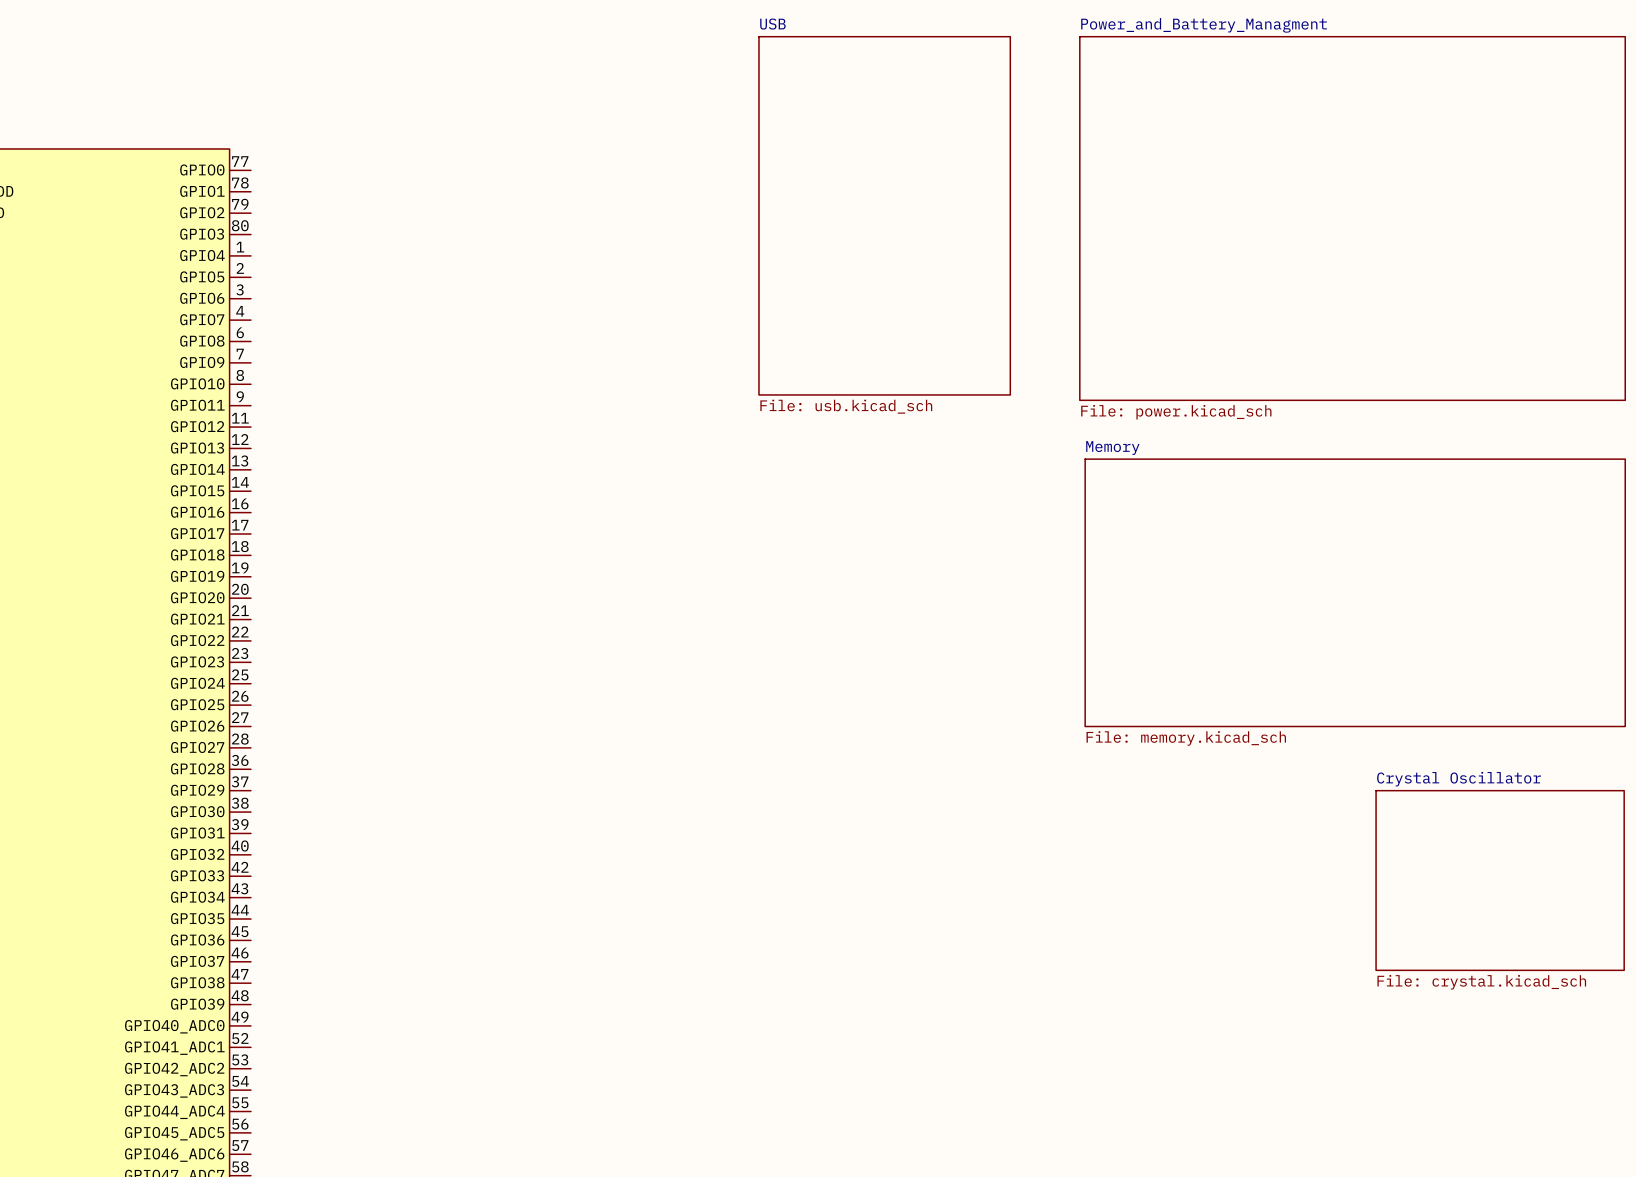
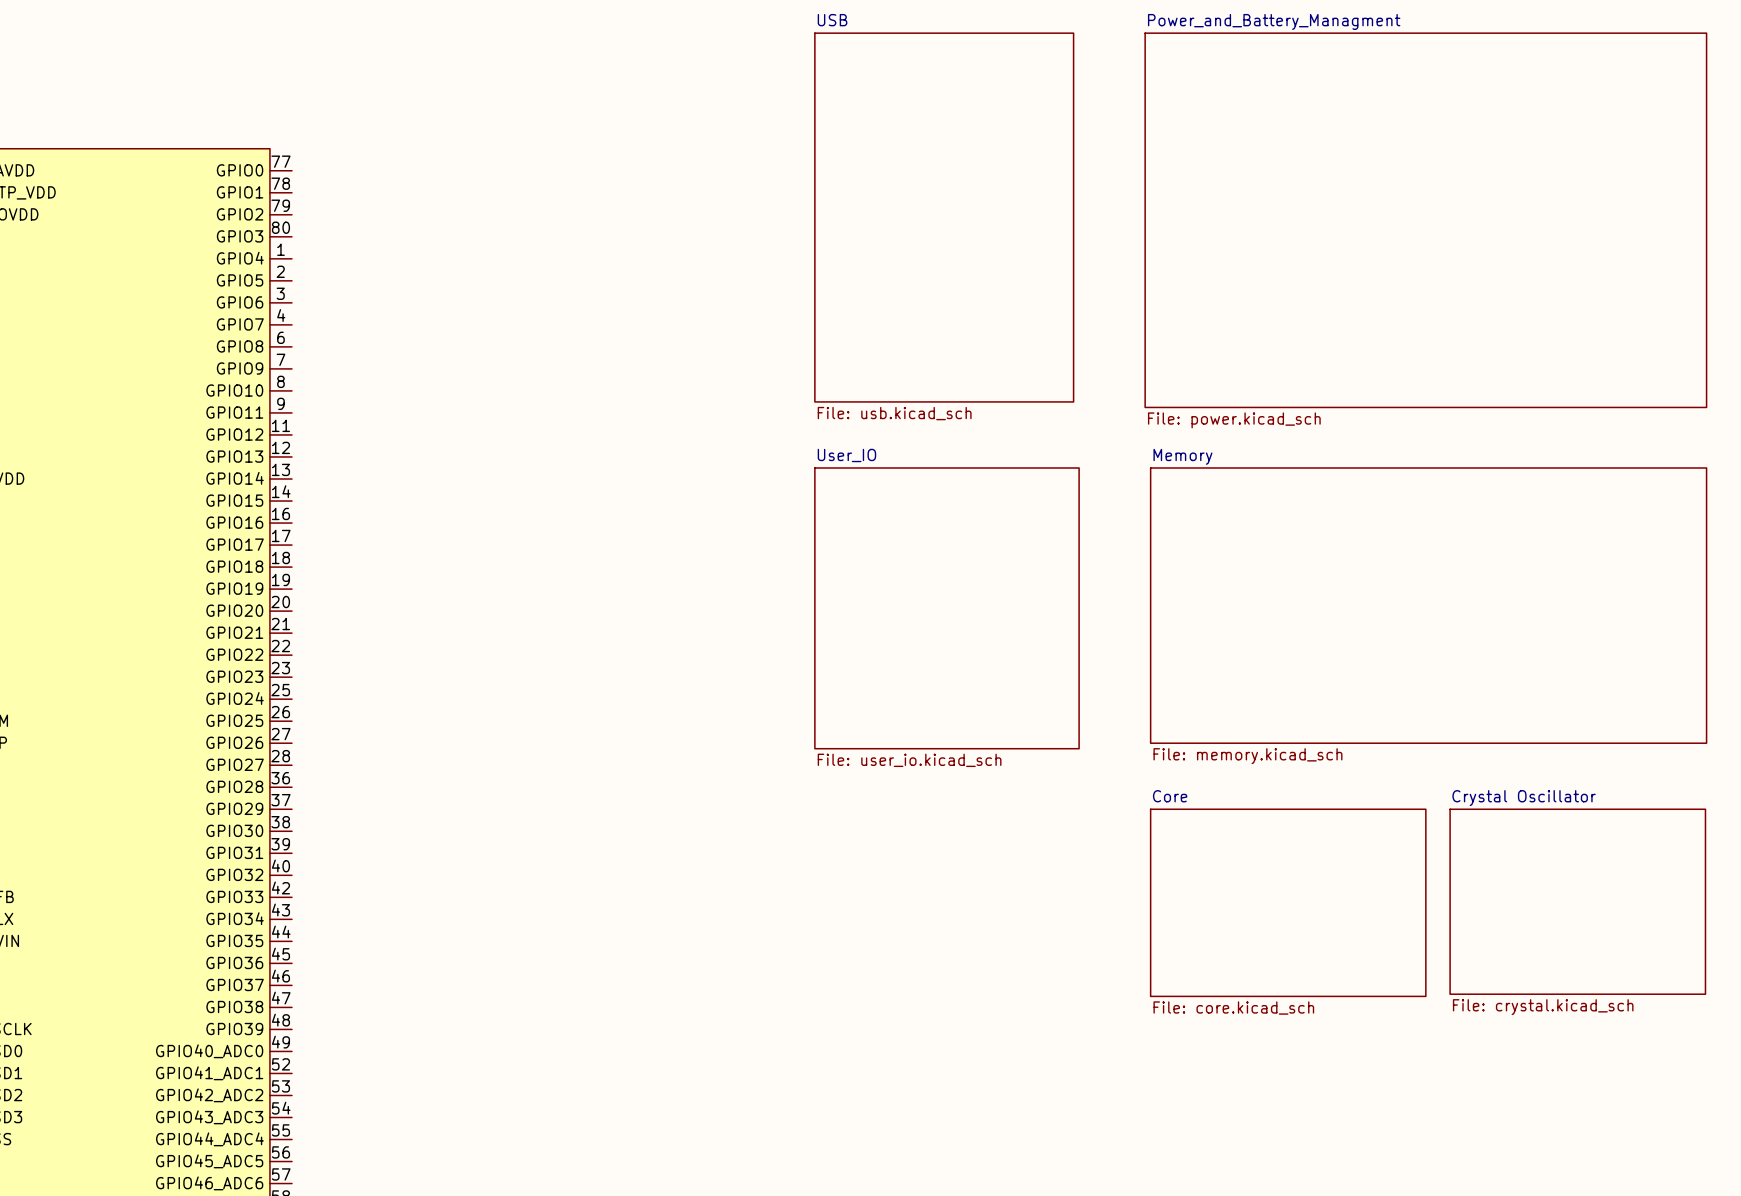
sheet User_IO: none -> File: user_io.kicad_sch (946, 608)
sheet Core: none -> File: core.kicad_sch (1288, 902)

